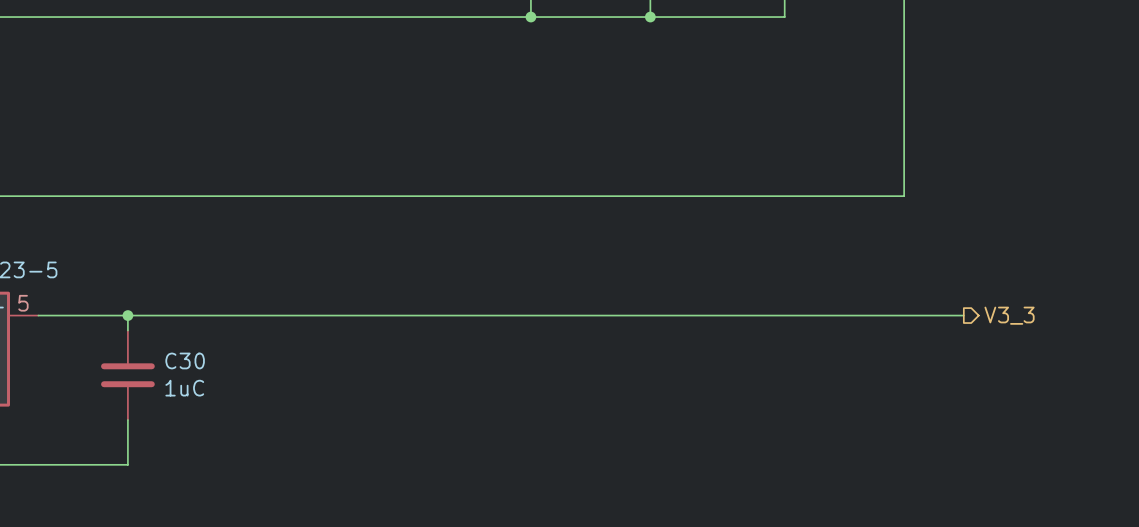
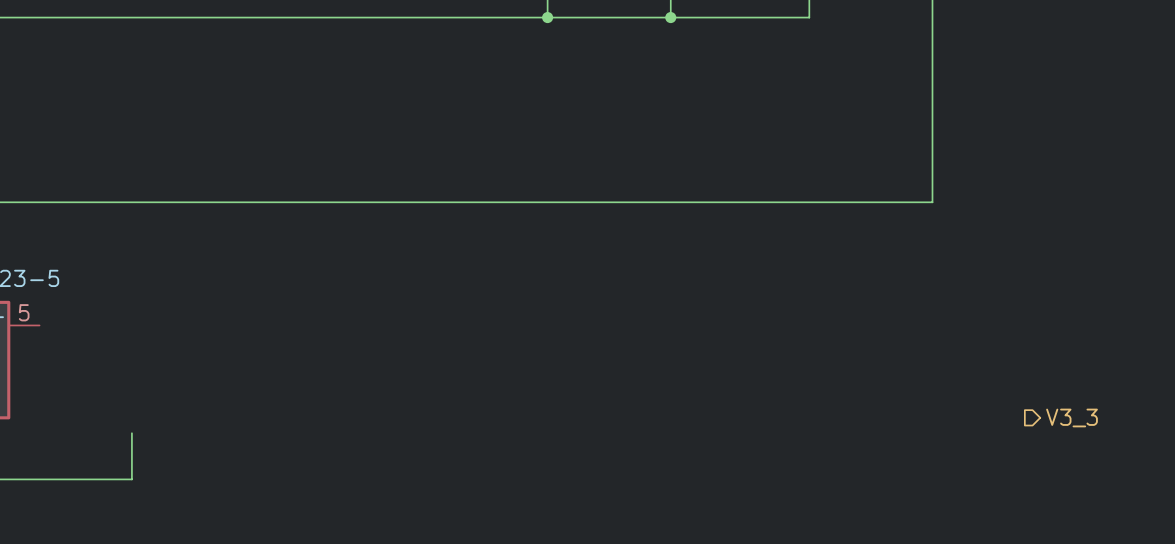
wire: (38, 315) (963, 315) -> none
wire: (127, 315) (127, 330) -> none
junction: (127, 315) -> none
hierarchical label position: V3_3 (1009, 315) -> V3_3 (1072, 417)
C30: 1uC (127, 375) -> none

